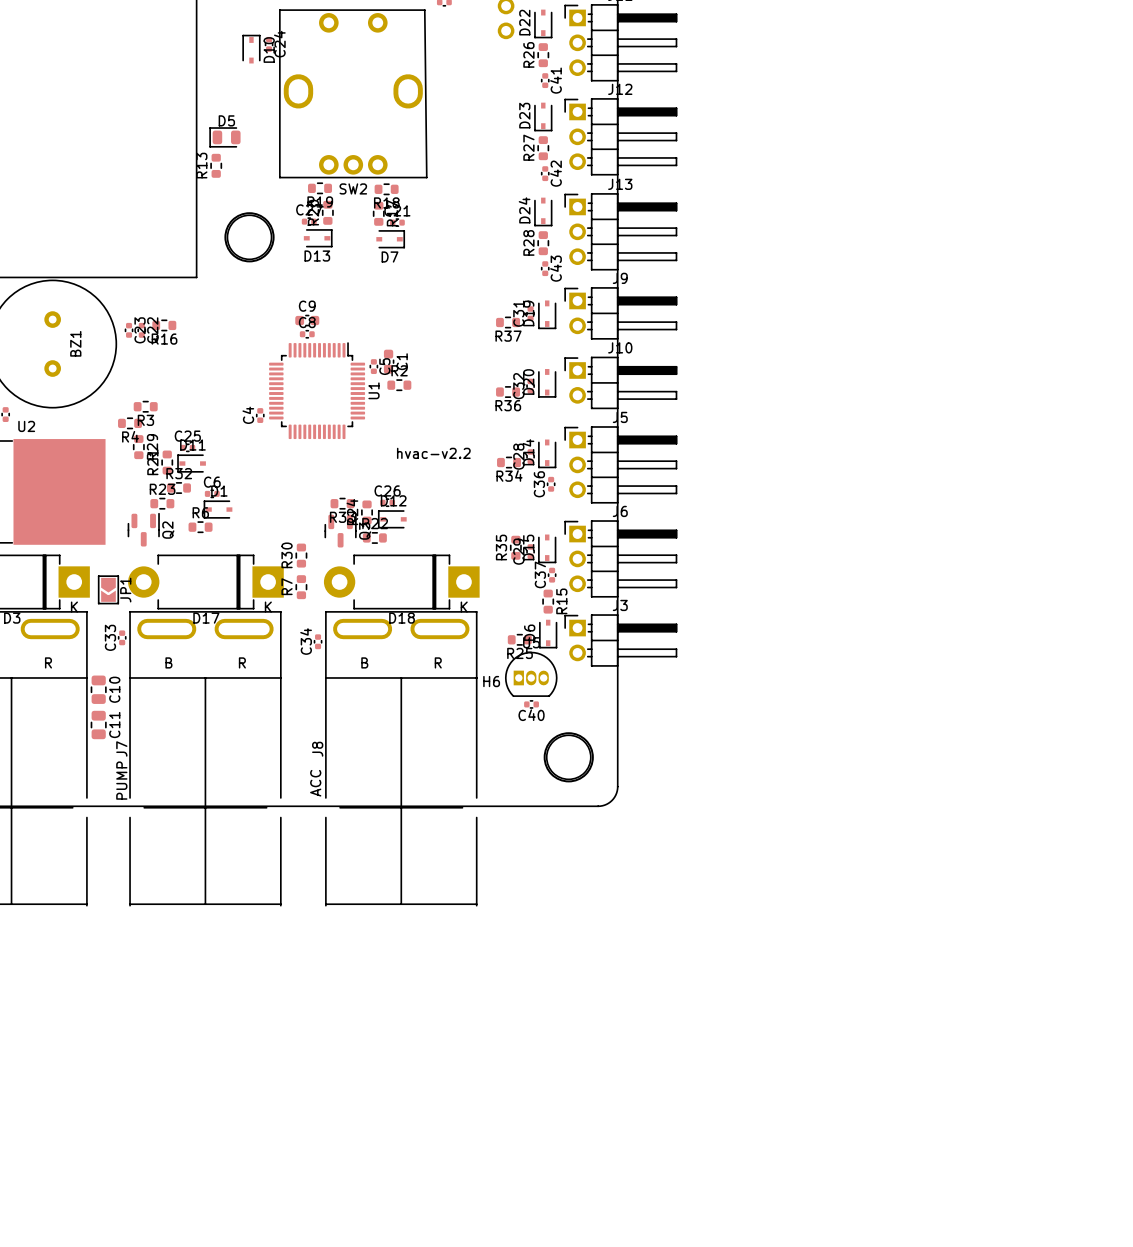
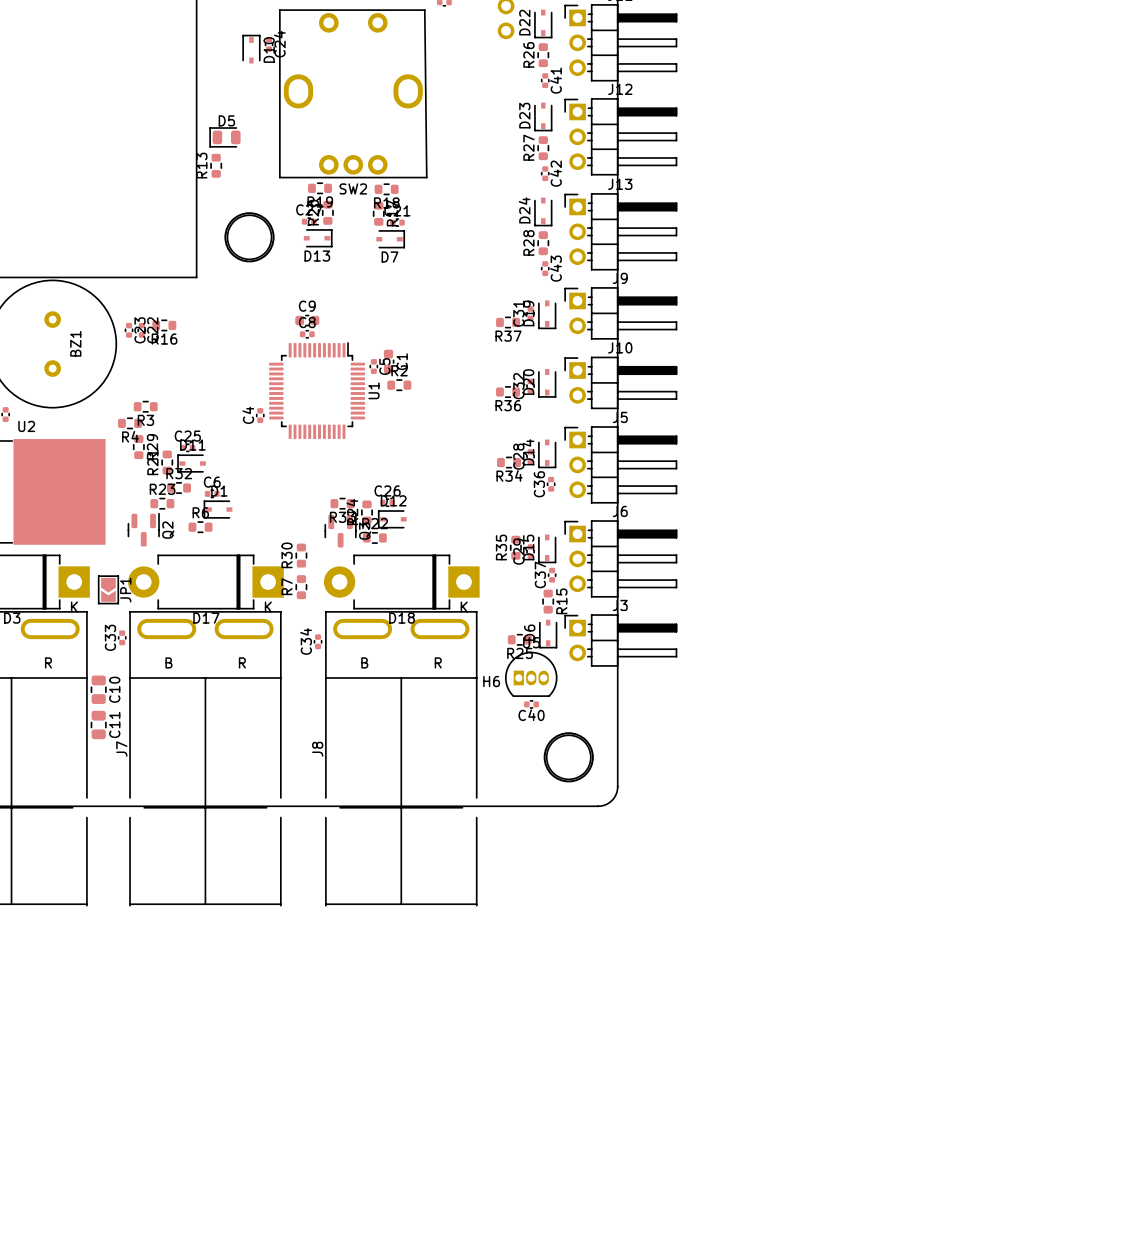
text: hvac-v2.2 (433, 453) -> none
text: PUMP (121, 780) -> none
text: ACC (315, 783) -> none

